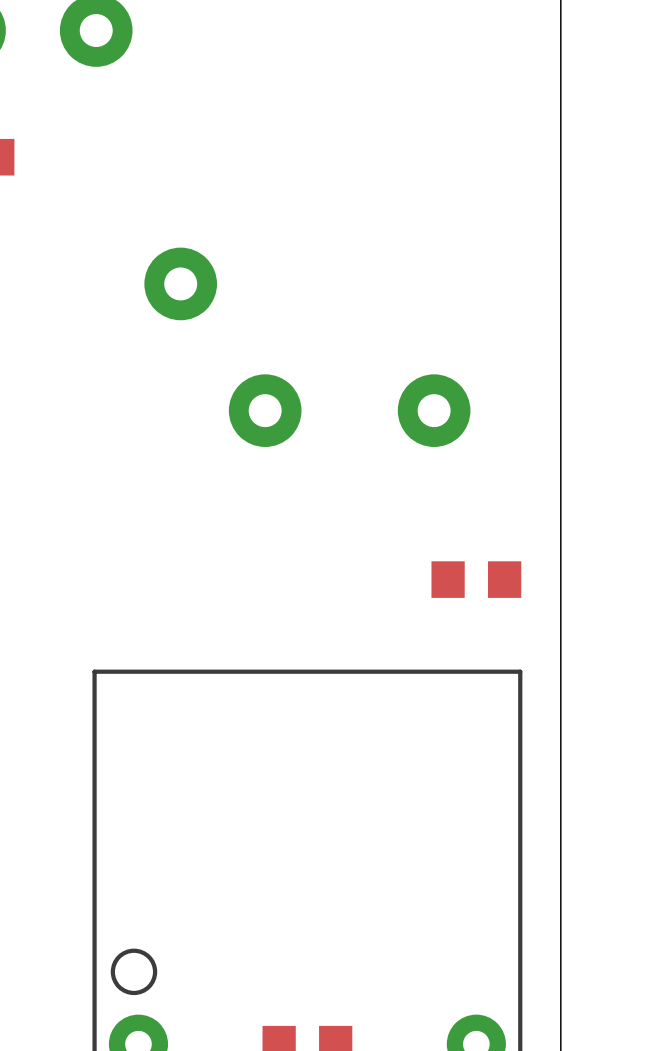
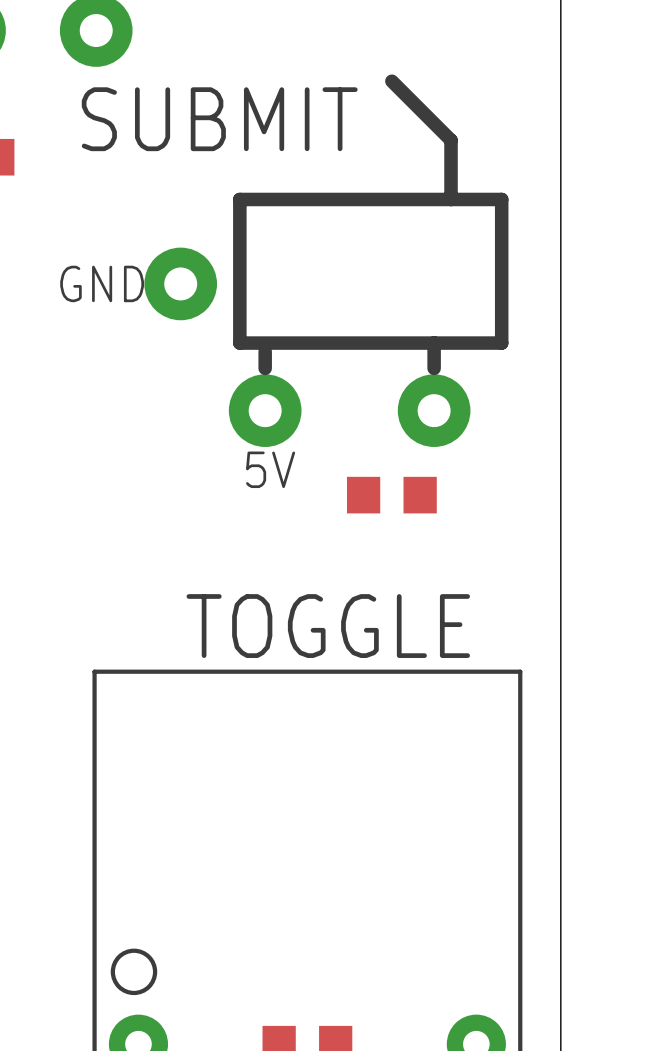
line: none -> (391, 81) (451, 140) (451, 199)
text: none -> SUBMIT (219, 119)
line: none -> (239, 199) (501, 199) (501, 343) (239, 343) (239, 199)
text: none -> GND (102, 283)
line: none -> (434, 343) (434, 368)
line: none -> (265, 351) (265, 368)
text: none -> 5V (270, 469)
part position: (476, 579) -> (391, 495)
text: none -> TOGGLE (328, 626)

